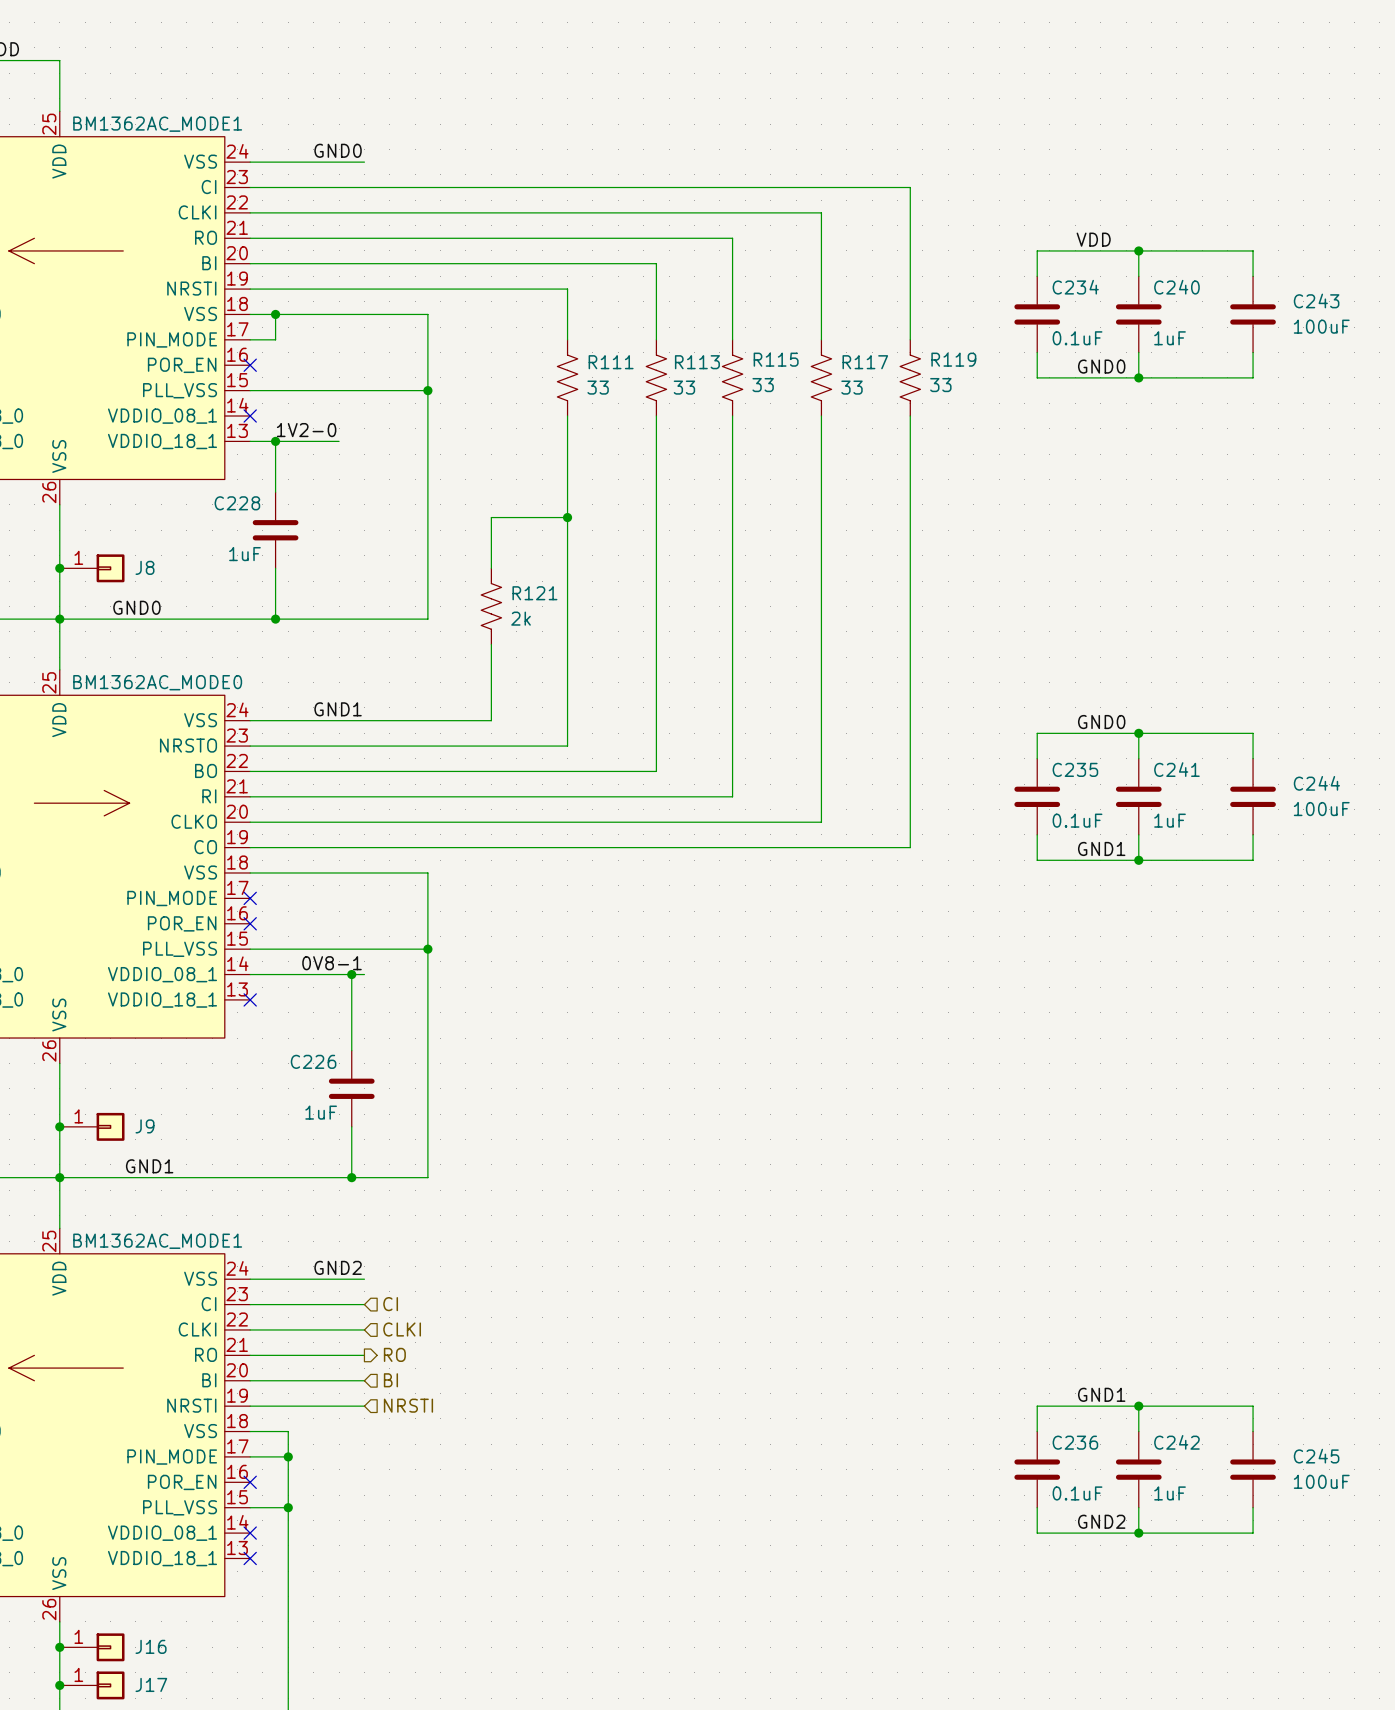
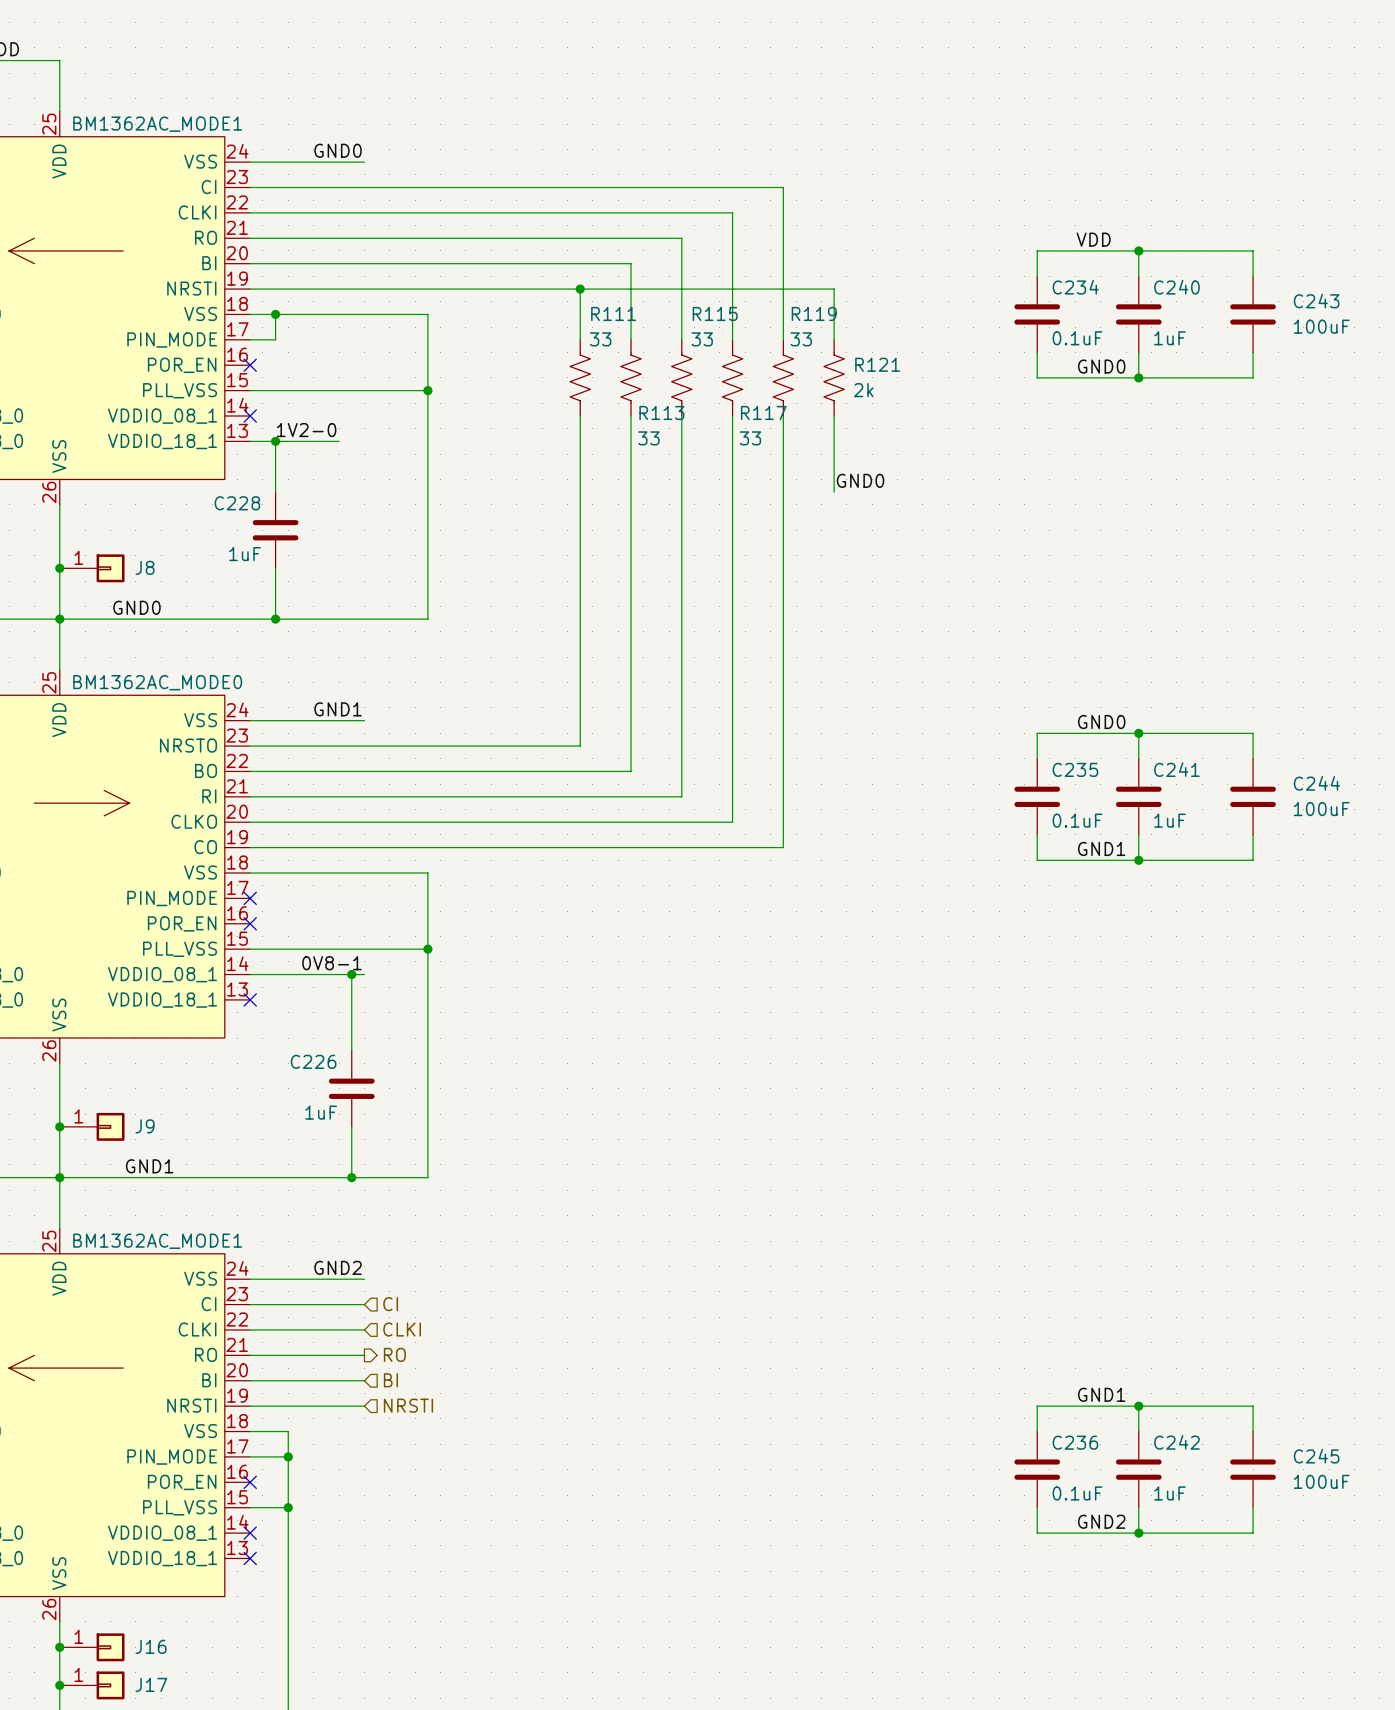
wire: (783, 187) (910, 187) (910, 339) -> (783, 187) (783, 339)
wire: (732, 212) (821, 212) (821, 339) -> none
wire: (681, 238) (732, 238) -> (732, 212) (732, 238)
wire: none -> (681, 238) (681, 339)
wire: (631, 263) (656, 263) (656, 339) -> (631, 263) (631, 339)
wire: (567, 289) (567, 339) -> (567, 289) (834, 289) (834, 339)
wire: none -> (580, 289) (580, 339)
junction: none -> (580, 289)
R115 name: R115 (776, 359) -> R117 (763, 412)
R119 name position: R119 (953, 359) -> R119 (814, 313)
R111 name position: R111 (611, 362) -> R111 (613, 313)
R113 name position: R113 (697, 362) -> R113 (661, 412)
R111 position: (567, 377) -> (580, 377)
R113 position: (656, 377) -> (631, 377)
R115: none -> 33 (681, 377)
R117: 33 (821, 377) -> none
R119 position: (910, 377) -> (783, 377)
R115 value position: 33 (763, 385) -> 33 (750, 438)
R119 value position: 33 (940, 385) -> 33 (801, 339)
R111 value position: 33 (598, 387) -> 33 (600, 339)
R113 value position: 33 (684, 387) -> 33 (648, 438)
wire: (567, 416) (567, 746) -> (580, 416) (580, 746) (567, 746)
wire: (656, 416) (656, 771) (631, 771) -> (631, 416) (631, 771)
wire: none -> (681, 416) (681, 796)
wire: (821, 416) (821, 822) (732, 822) -> none
wire: none -> (834, 416) (834, 492)
wire: (910, 416) (910, 847) (783, 847) -> (783, 416) (783, 847)
label: none -> GND0 (860, 480)
wire: (567, 517) (491, 517) (491, 568) -> none
junction: (567, 517) -> none
R121 position: (491, 606) -> (834, 377)
wire: (491, 644) (491, 720) (364, 720) -> none
wire: (681, 796) (732, 796) -> (732, 822) (732, 796)

